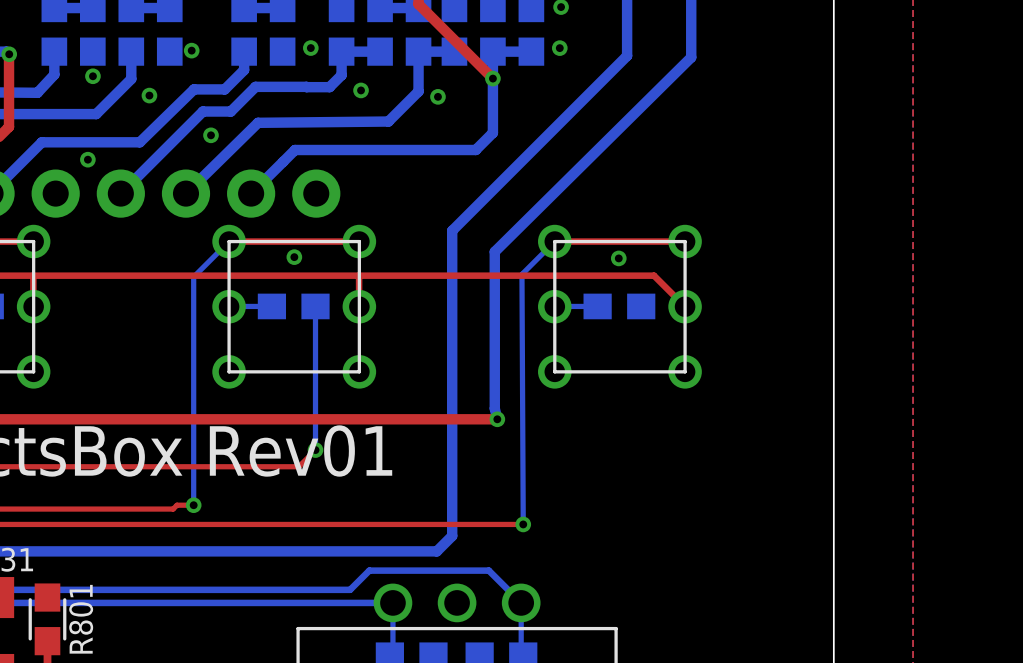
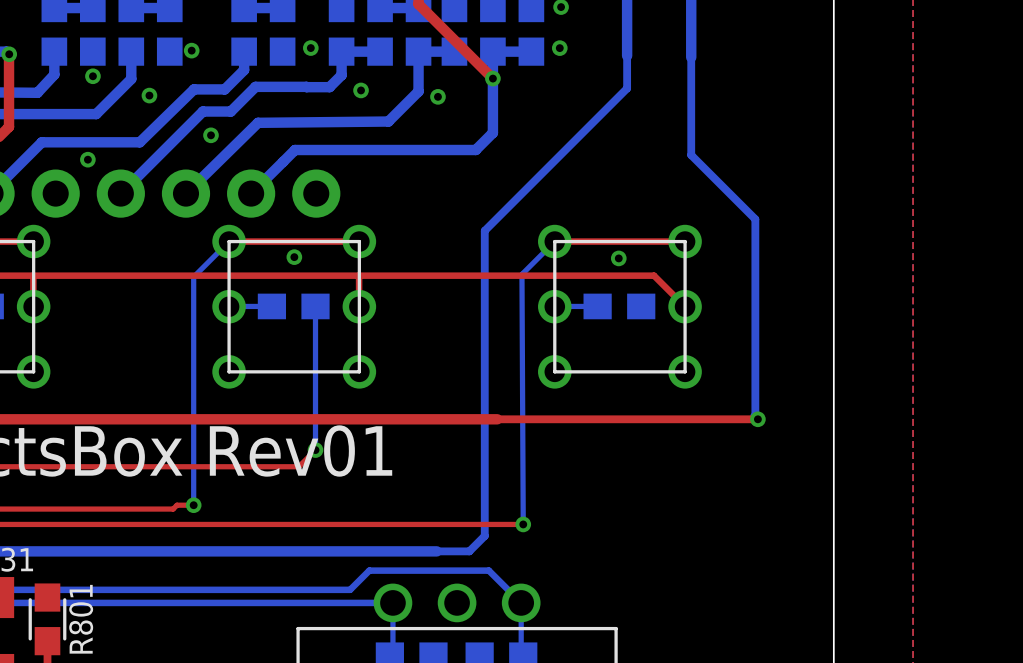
bottom track: (627, 55) (452, 230) (452, 535) (436, 551) -> (627, 55) (627, 88) (484, 230) (484, 535) (469, 551) (436, 551)
bottom track: (691, 57) (494, 251) (494, 408) (497, 419) -> (691, 57) (691, 155) (755, 219) (755, 416) (757, 419)
top track: none -> (497, 419) (757, 419)
via: (497, 419) -> none
via: none -> (757, 419)

